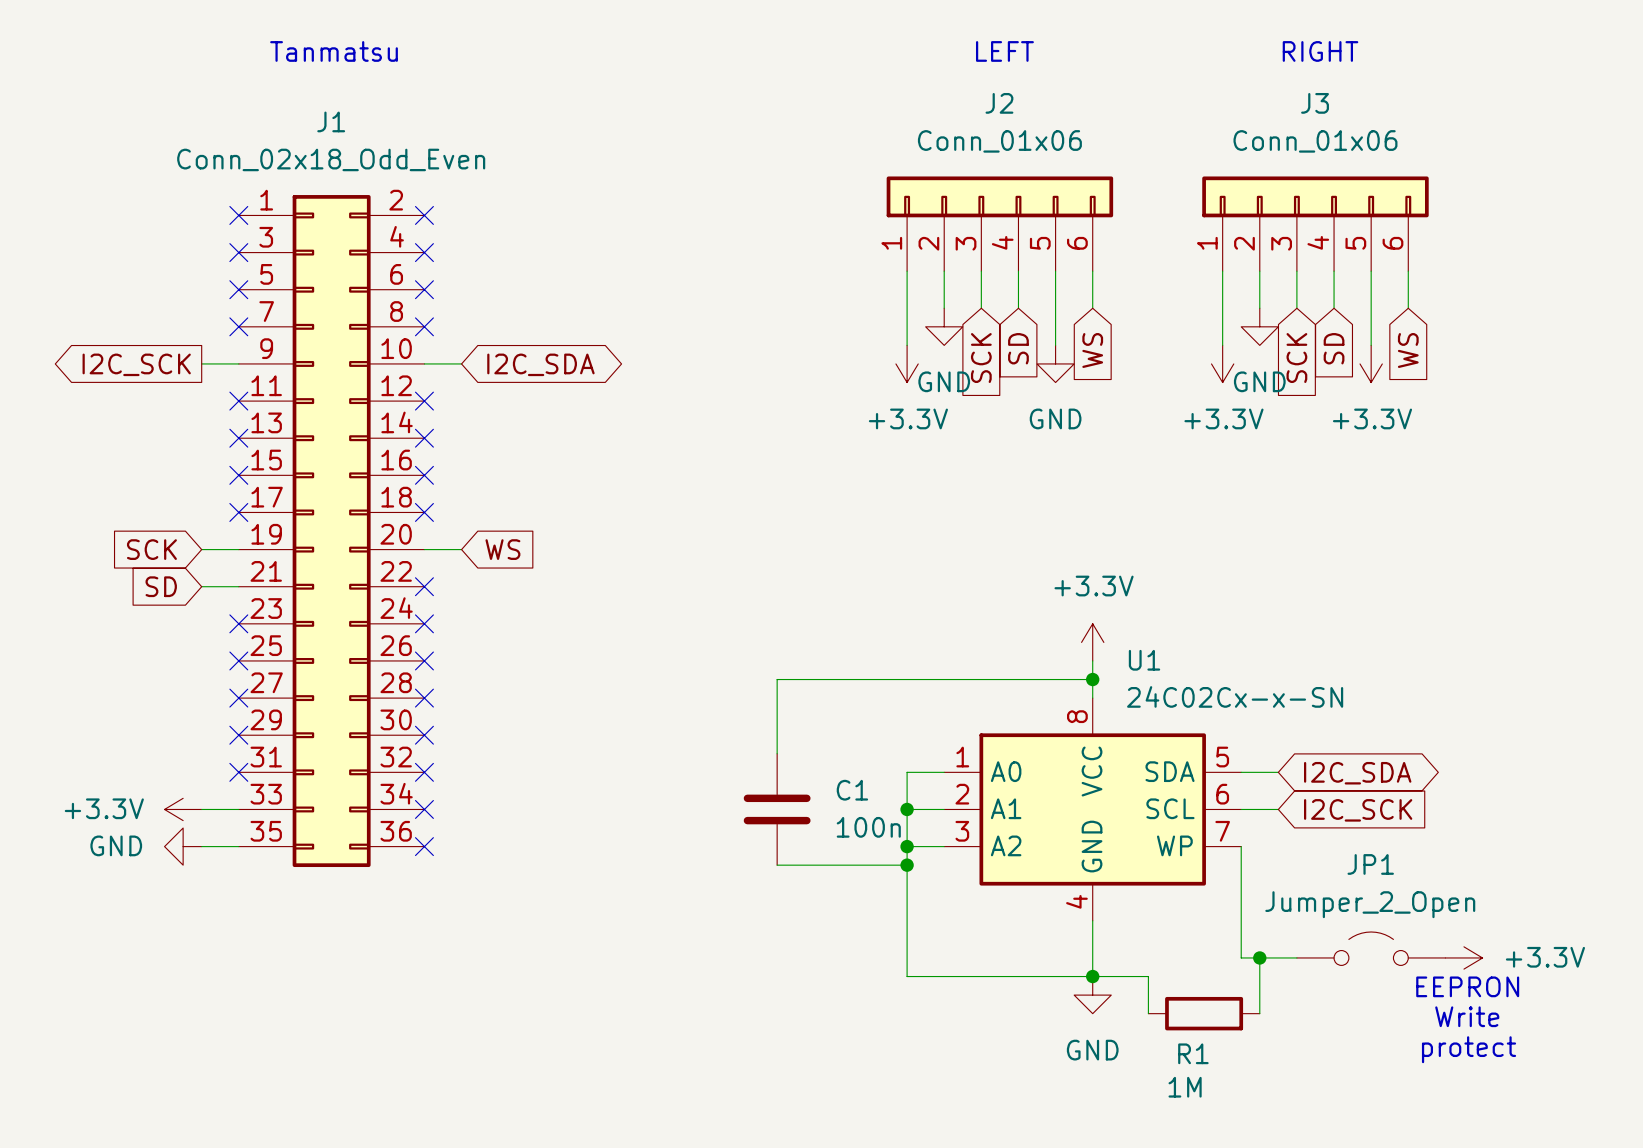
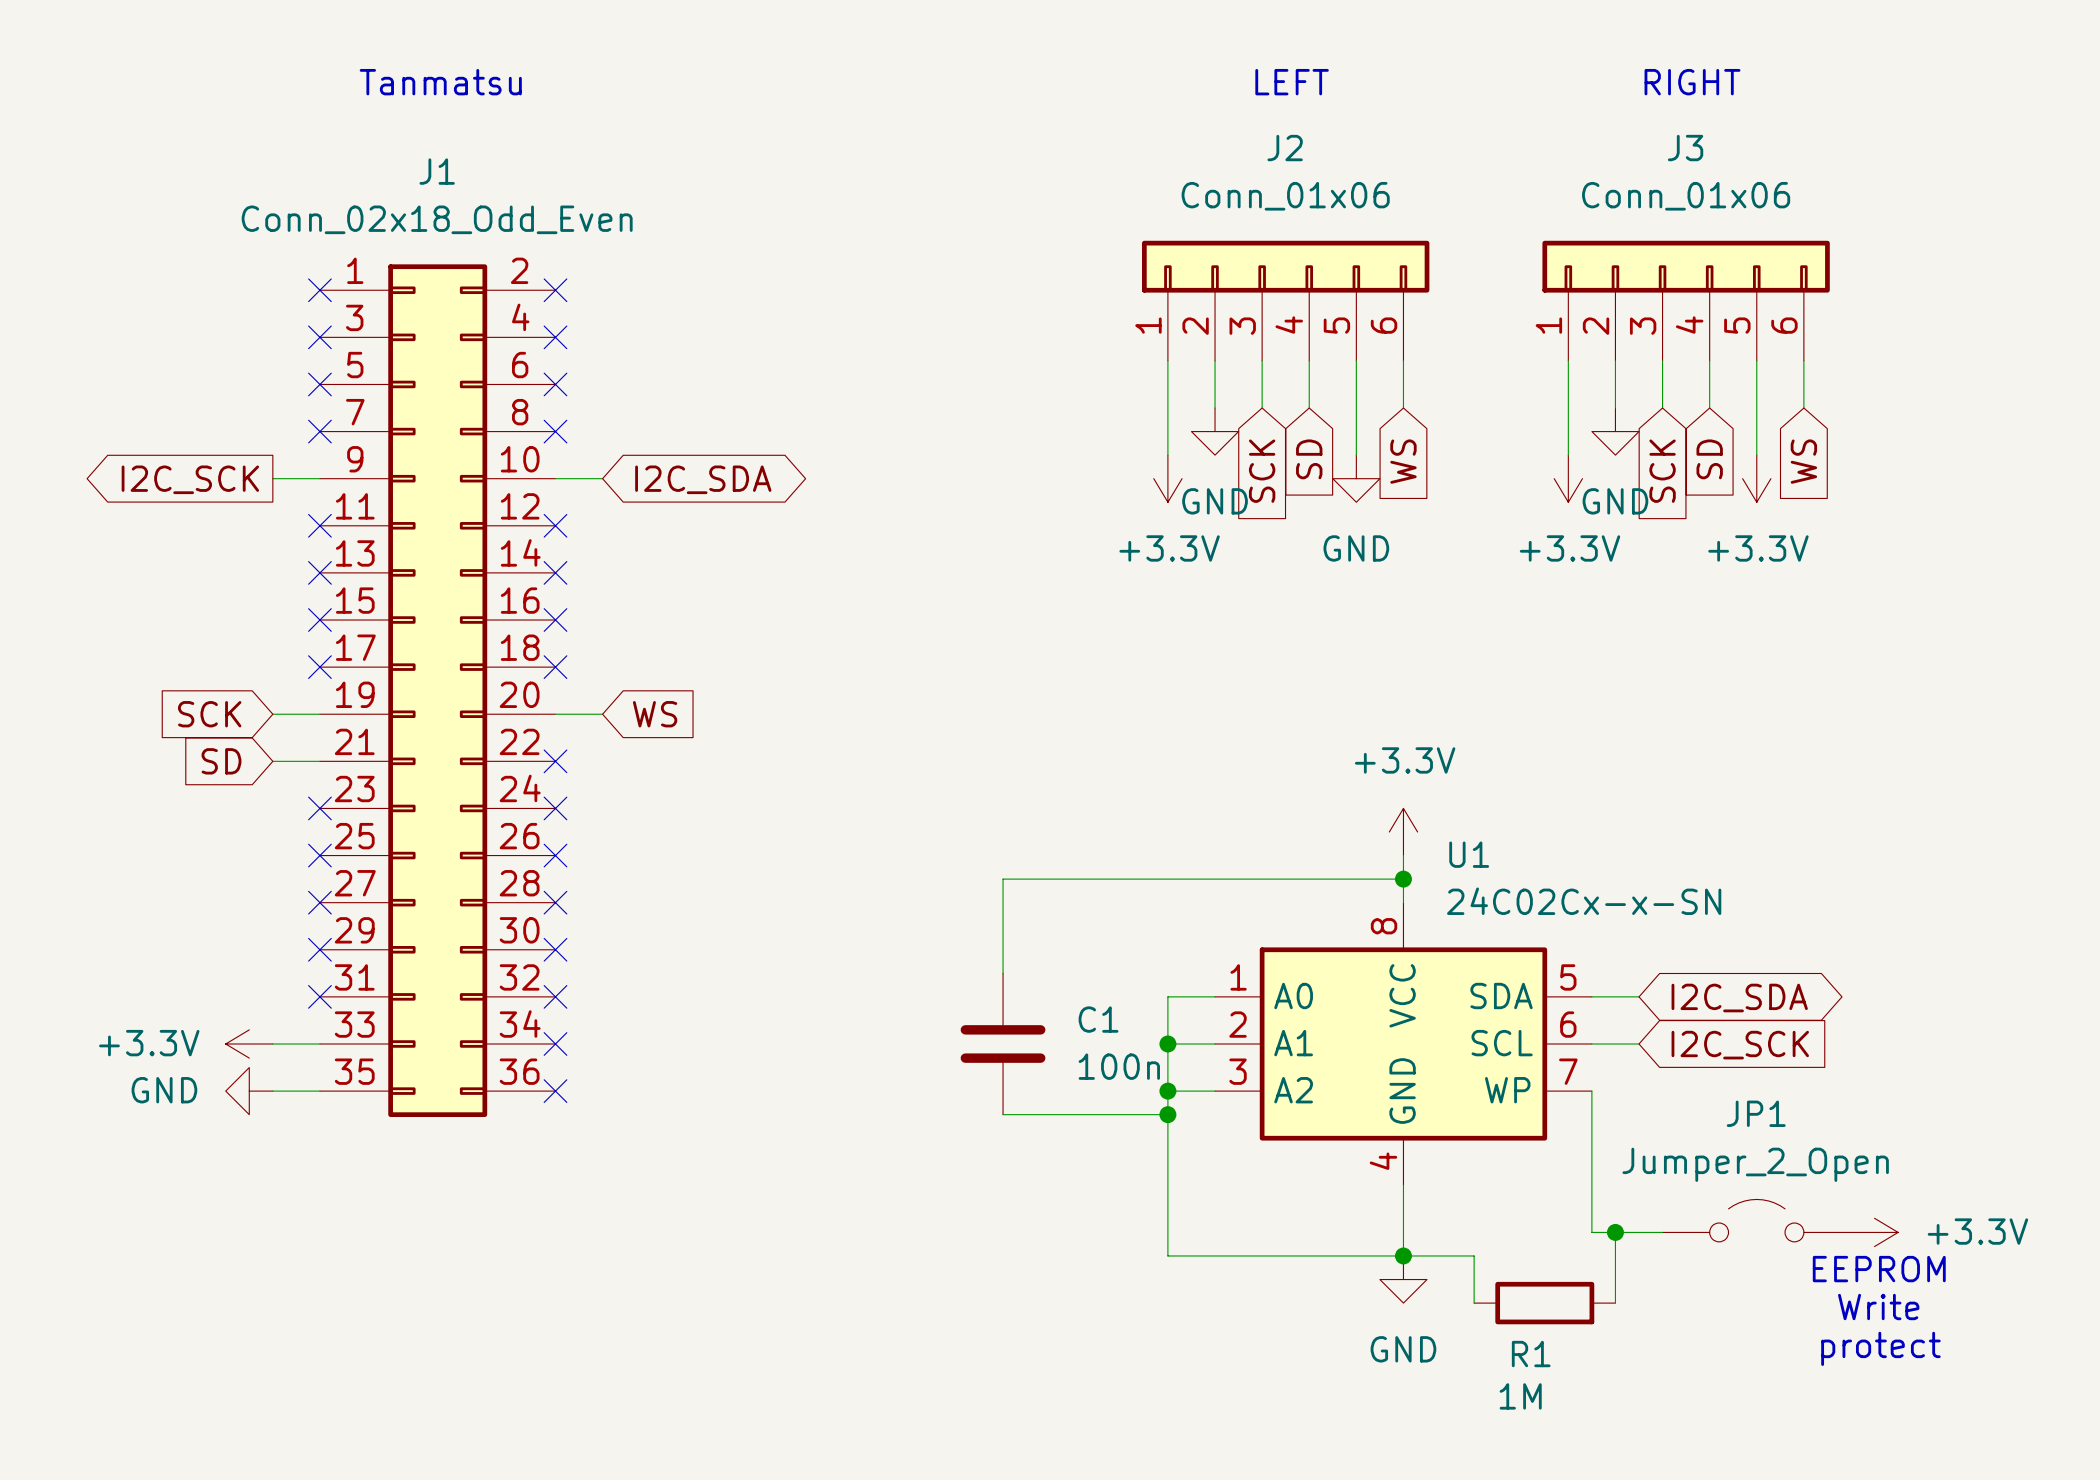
text: EEPRON (1467, 986) -> EEPROM (1879, 1269)

